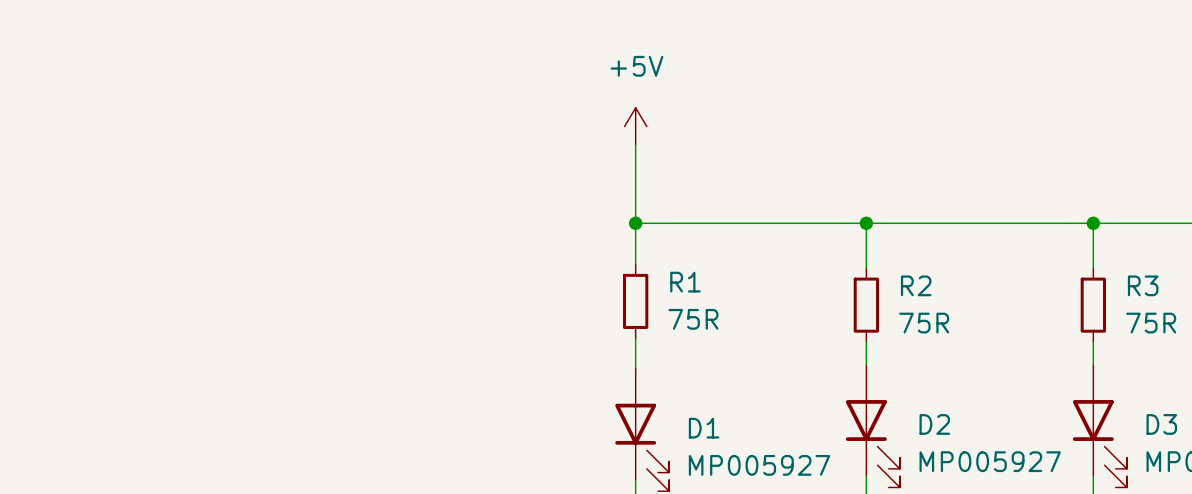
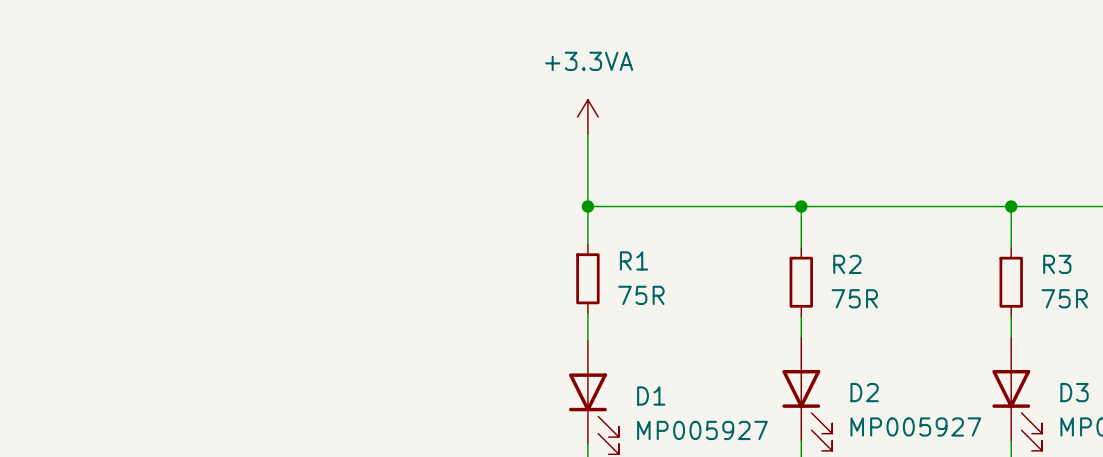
power symbol: +5V (635, 126) -> +3.3VA (587, 117)

